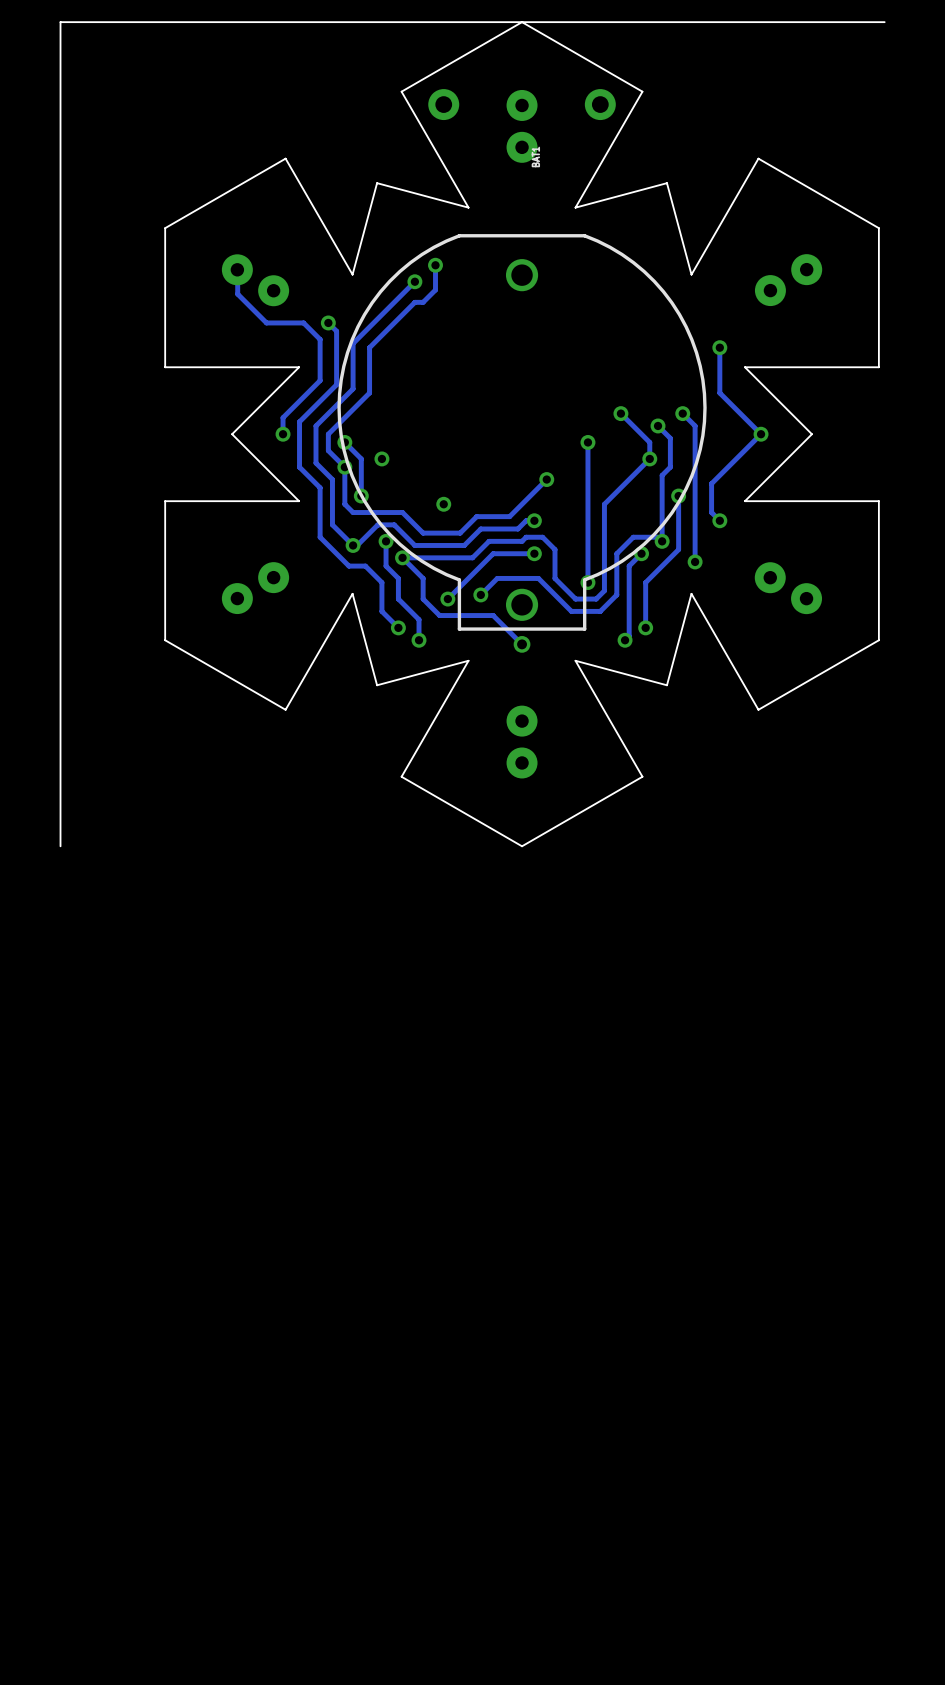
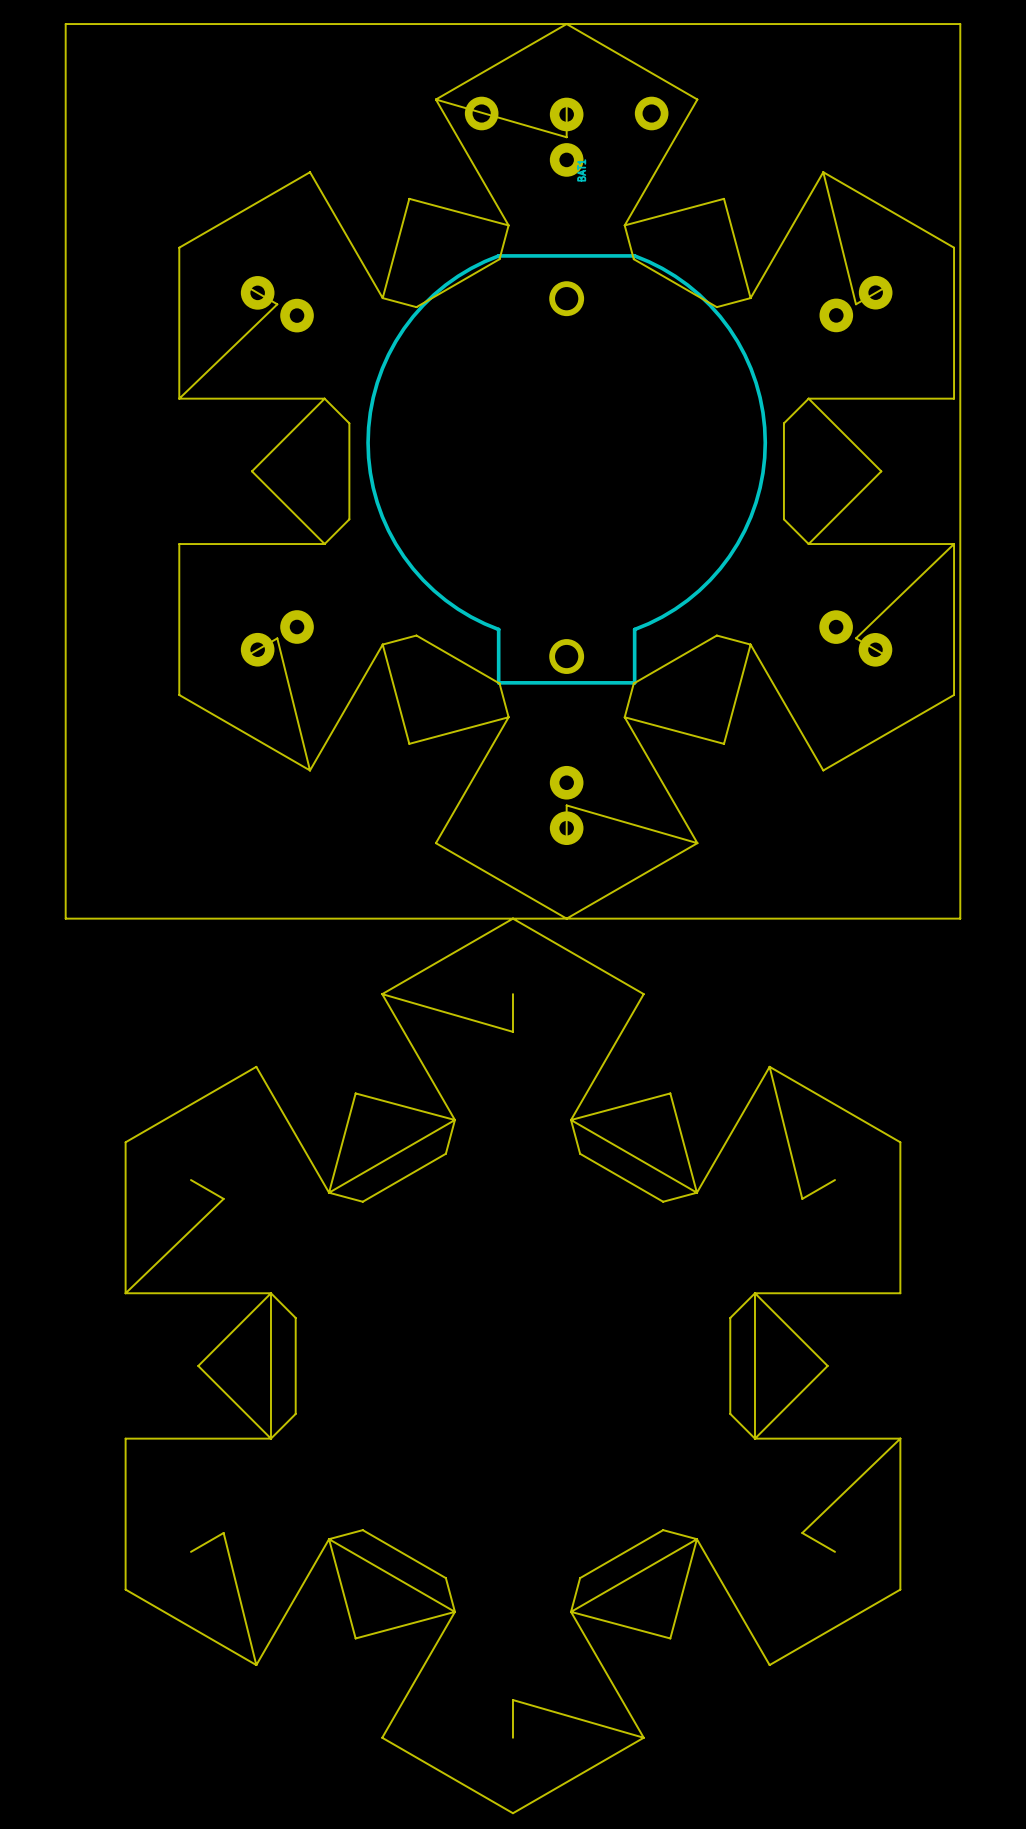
board edge: none -> (960, 24) (960, 918) (65, 918)
board edge: none -> (566, 99) (566, 137) (435, 99)
board edge: none -> (823, 172) (855, 304) (888, 285)
board edge: none -> (508, 225) (499, 259) (416, 307) (382, 298)
board edge: none -> (624, 225) (633, 259) (716, 307) (750, 298)
board edge: none -> (244, 285) (277, 304) (179, 398)
track: (435, 265) (435, 289) (423, 302) (414, 302) (369, 347) (369, 393) (328, 434) (328, 450) (344, 467) (344, 504) (353, 512) (402, 512) (423, 533) (460, 533) (476, 516) (509, 516) (546, 479) -> none
via: (435, 265) -> none
track: (237, 269) (237, 294) (266, 322) (303, 322) (320, 339) (320, 380) (283, 417) (283, 434) -> none
track: (414, 281) (353, 343) (353, 388) (316, 425) (316, 463) (332, 479) (332, 524) (353, 545) (357, 545) (377, 524) (394, 524) (414, 545) (464, 545) (480, 529) (517, 529) (526, 520) (534, 520) -> none
via: (414, 281) -> none
track: (328, 322) (336, 331) (336, 384) (299, 421) (299, 467) (320, 487) (320, 537) (348, 566) (365, 566) (381, 582) (381, 611) (398, 627) -> none
via: (328, 322) -> none
track: (719, 347) (719, 393) (761, 434) (711, 483) (711, 512) (719, 520) -> none
via: (719, 347) -> none
board edge: none -> (324, 398) (349, 423) (349, 519) (324, 544)
board edge: none -> (808, 398) (783, 423) (783, 519) (808, 544)
track: (620, 413) (649, 442) (649, 458) (604, 504) (604, 590) (596, 599) (575, 599) (555, 578) (555, 549) (542, 537) (526, 537) (522, 541) (489, 541) (472, 557) (402, 557) (423, 578) (423, 599) (439, 615) (493, 615) (522, 644) -> none
via: (620, 413) -> none
track: (682, 413) (695, 425) (695, 561) -> none
via: (682, 413) -> none
track: (658, 425) (670, 438) (670, 467) (662, 475) (662, 541) (658, 537) (633, 537) (616, 553) (616, 594) (600, 611) (571, 611) (538, 578) (497, 578) (480, 594) -> none
via: (658, 425) -> none
via: (283, 434) -> none
via: (761, 434) -> none
track: (344, 442) (361, 458) (361, 496) -> none
via: (344, 442) -> none
track: (587, 442) (587, 582) -> none
via: (587, 442) -> none
via: (381, 458) -> none
via: (649, 458) -> none
via: (344, 467) -> none
via: (546, 479) -> none
via: (361, 496) -> none
track: (678, 496) (678, 549) (645, 582) (645, 627) -> none
via: (678, 496) -> none
board edge: none -> (954, 544) (855, 638) (888, 657)
via: (443, 504) -> none
via: (534, 520) -> none
via: (719, 520) -> none
track: (386, 541) (386, 566) (398, 578) (398, 599) (419, 619) (419, 640) -> none
via: (386, 541) -> none
via: (662, 541) -> none
via: (353, 545) -> none
track: (534, 553) (493, 553) (447, 599) -> none
via: (534, 553) -> none
track: (641, 553) (629, 566) (629, 636) (625, 640) -> none
via: (641, 553) -> none
via: (402, 557) -> none
via: (695, 561) -> none
via: (587, 582) -> none
board edge: none -> (382, 644) (416, 635) (499, 683) (508, 717)
board edge: none -> (750, 644) (716, 635) (633, 683) (624, 717)
via: (480, 594) -> none
via: (447, 599) -> none
board edge: none -> (244, 657) (277, 638) (310, 770)
via: (398, 627) -> none
via: (645, 627) -> none
via: (419, 640) -> none
via: (625, 640) -> none
via: (522, 644) -> none
board edge: none -> (697, 843) (566, 805) (566, 843)
board edge: none -> (382, 994) (454, 1120)
board edge: none -> (382, 994) (512, 918) (643, 994) (571, 1120)
board edge: none -> (512, 994) (512, 1031) (382, 994)
board edge: none -> (769, 1066) (900, 1142) (900, 1293) (754, 1293)
board edge: none -> (769, 1066) (696, 1192)
board edge: none -> (769, 1066) (802, 1198) (834, 1180)
board edge: none -> (454, 1120) (355, 1093) (329, 1192)
board edge: none -> (454, 1120) (329, 1192)
board edge: none -> (454, 1120) (445, 1153) (362, 1201) (329, 1192)
board edge: none -> (571, 1120) (670, 1093) (696, 1192)
board edge: none -> (571, 1120) (580, 1153) (663, 1201) (696, 1192)
board edge: none -> (571, 1120) (696, 1192)
board edge: none -> (190, 1180) (223, 1198) (125, 1293)
board edge: none -> (329, 1192) (256, 1066) (125, 1142) (125, 1293)
board edge: none -> (270, 1293) (125, 1293)
board edge: none -> (270, 1293) (198, 1365) (270, 1438)
board edge: none -> (270, 1293) (270, 1438)
board edge: none -> (270, 1293) (295, 1317) (295, 1413) (270, 1438)
board edge: none -> (754, 1293) (827, 1365) (754, 1438)
board edge: none -> (754, 1293) (730, 1317) (730, 1413) (754, 1438)
board edge: none -> (754, 1293) (754, 1438)
board edge: none -> (270, 1438) (125, 1438) (125, 1589) (256, 1665)
board edge: none -> (900, 1438) (900, 1589) (769, 1665) (696, 1539)
board edge: none -> (900, 1438) (754, 1438)
board edge: none -> (900, 1438) (802, 1532) (834, 1551)
board edge: none -> (329, 1539) (256, 1665)
board edge: none -> (329, 1539) (355, 1638) (454, 1611)
board edge: none -> (329, 1539) (454, 1611)
board edge: none -> (329, 1539) (362, 1530) (445, 1578) (454, 1611)
board edge: none -> (696, 1539) (670, 1638) (571, 1611)
board edge: none -> (696, 1539) (663, 1530) (580, 1578) (571, 1611)
board edge: none -> (696, 1539) (571, 1611)
board edge: none -> (190, 1551) (223, 1532) (256, 1665)
board edge: none -> (454, 1611) (382, 1737) (512, 1813) (643, 1737)
board edge: none -> (571, 1611) (643, 1737)
board edge: none -> (643, 1737) (512, 1700) (512, 1737)

